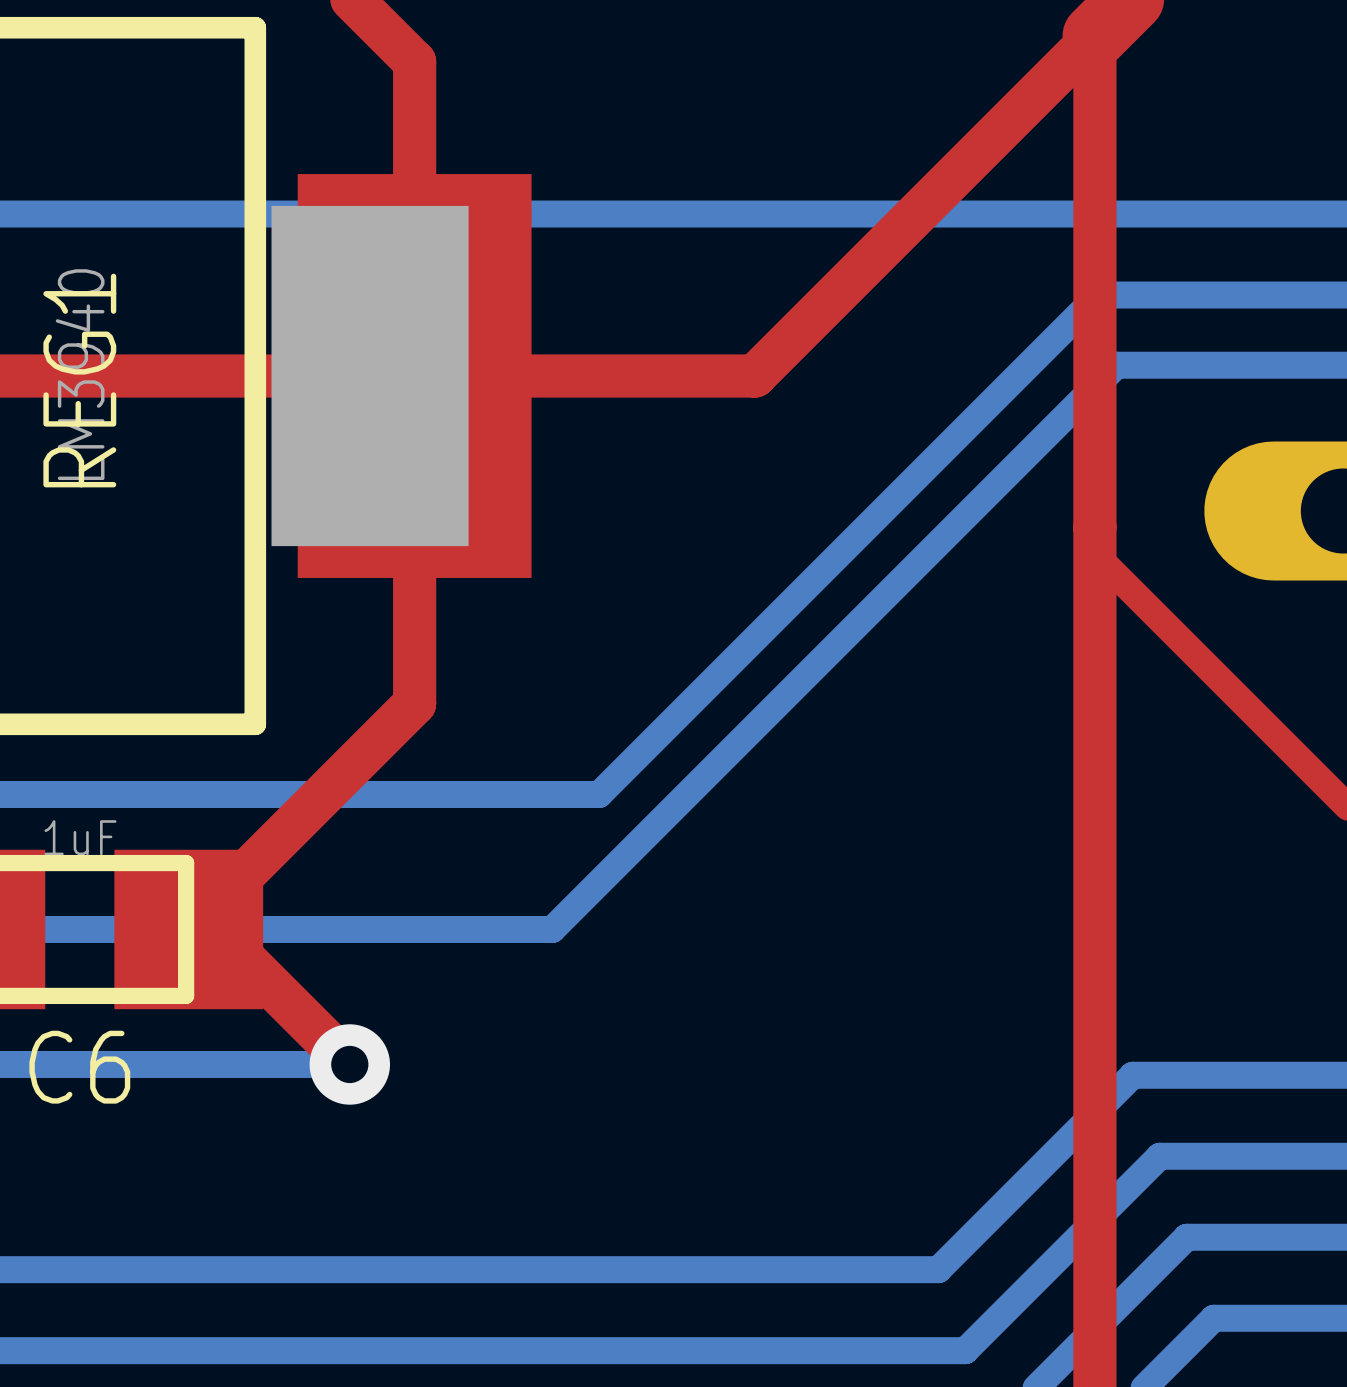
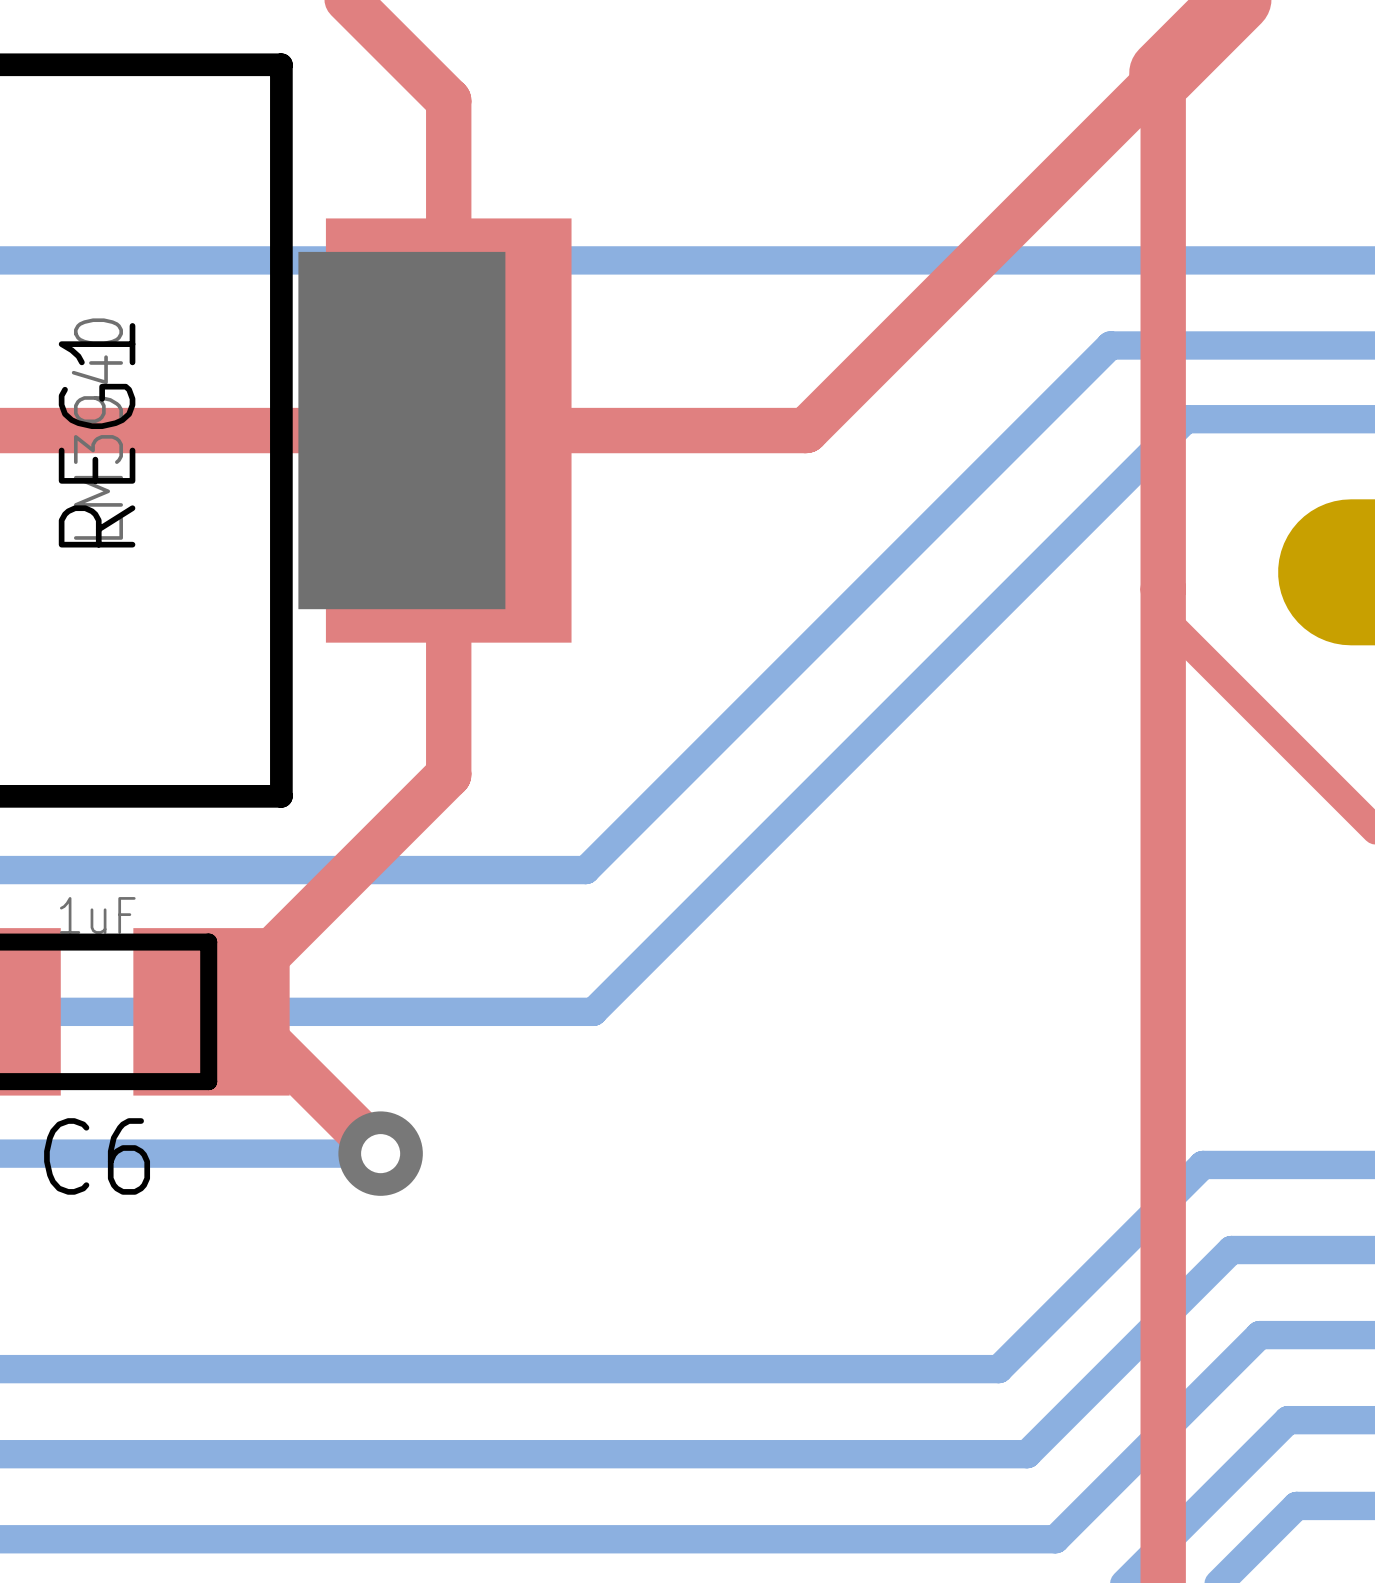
bottom track: (1098, 295) (599, 794) (545, 794) -> (1167, 345) (1110, 345) (585, 870)

